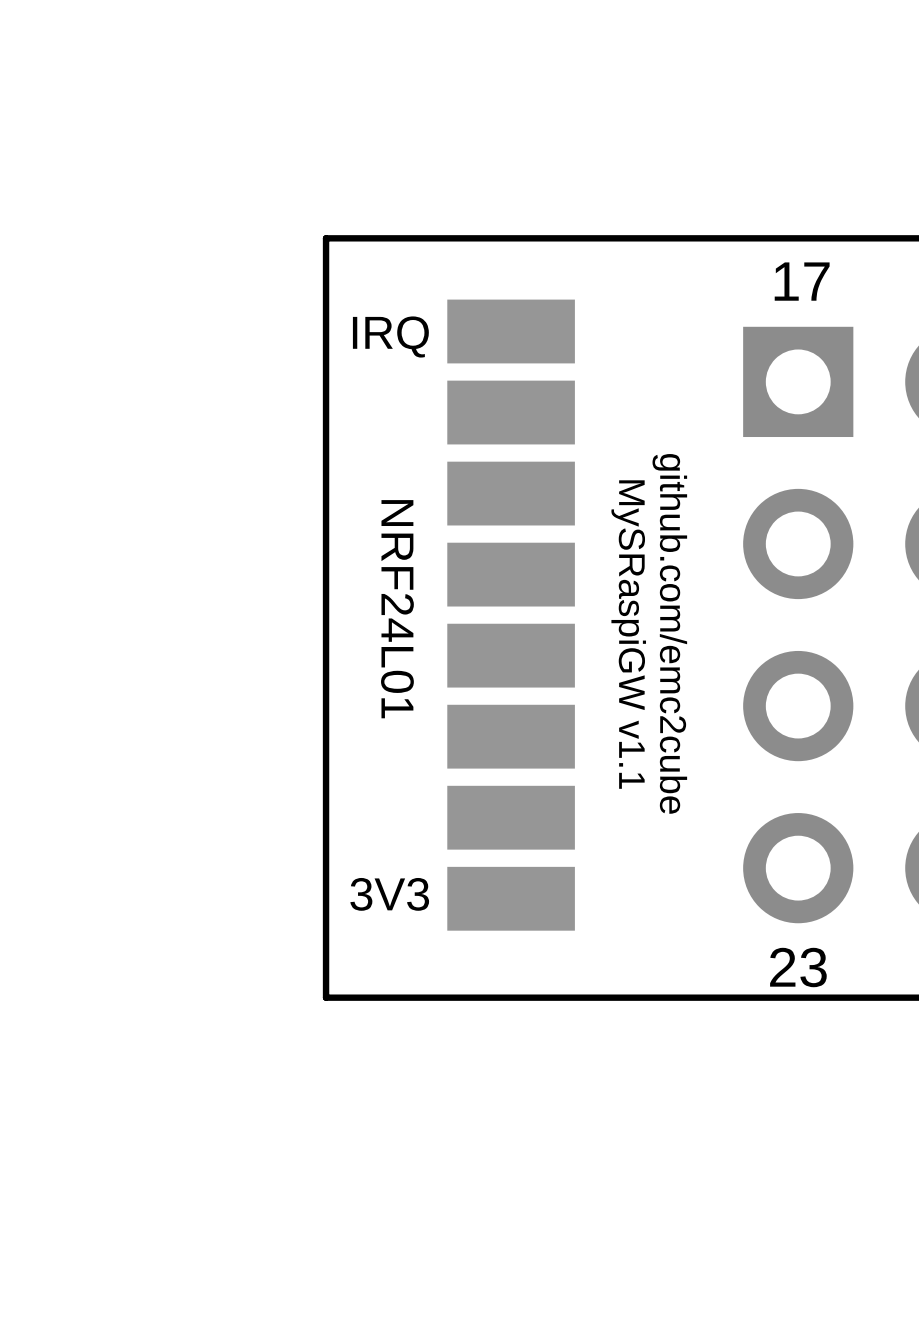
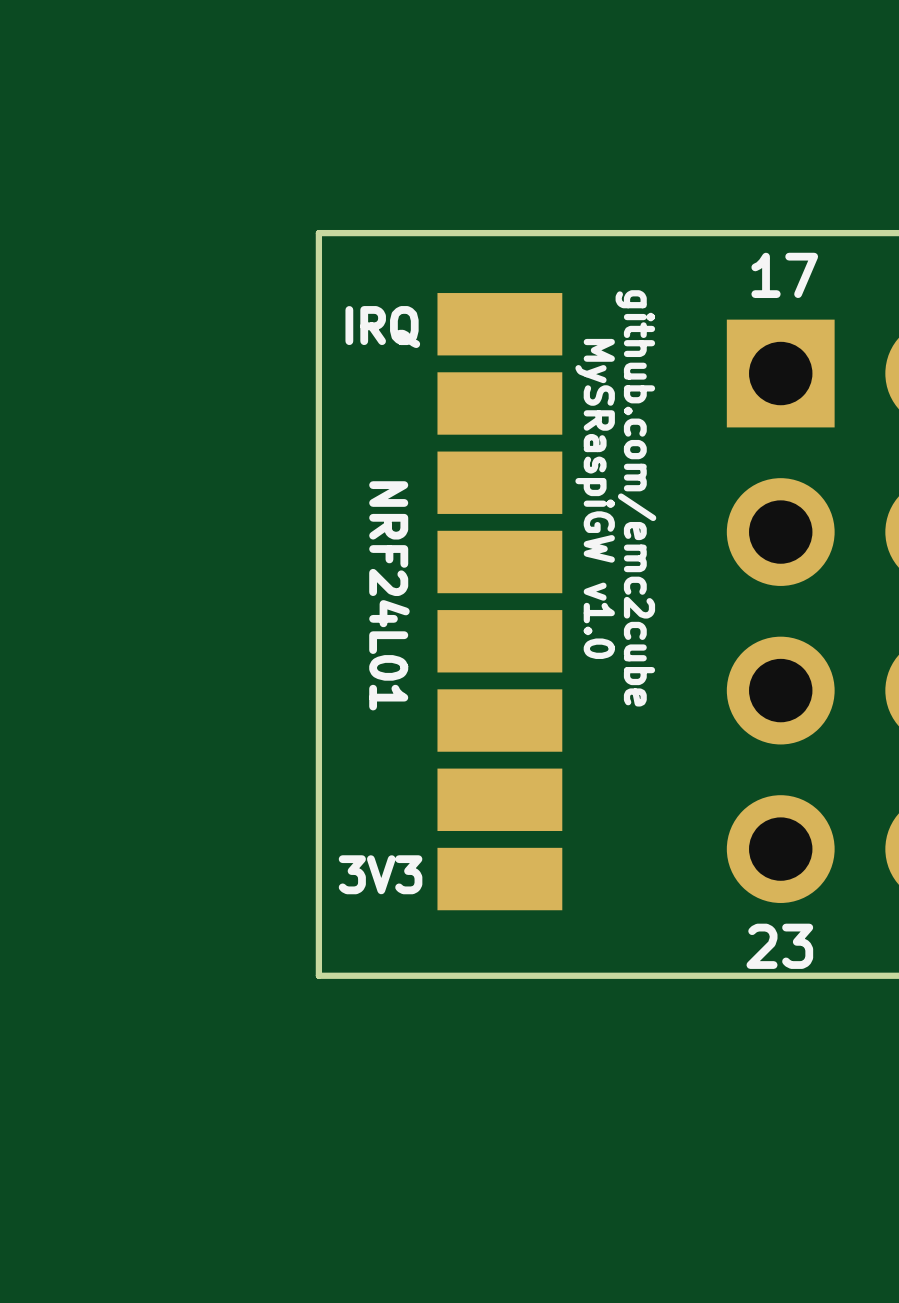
text position: github.com/emc2cube (669, 633) -> github.com/emc2cube (635, 498)
text: MySRaspiGW v1.1 (628, 634) -> MySRaspiGW v1.0 (595, 498)

